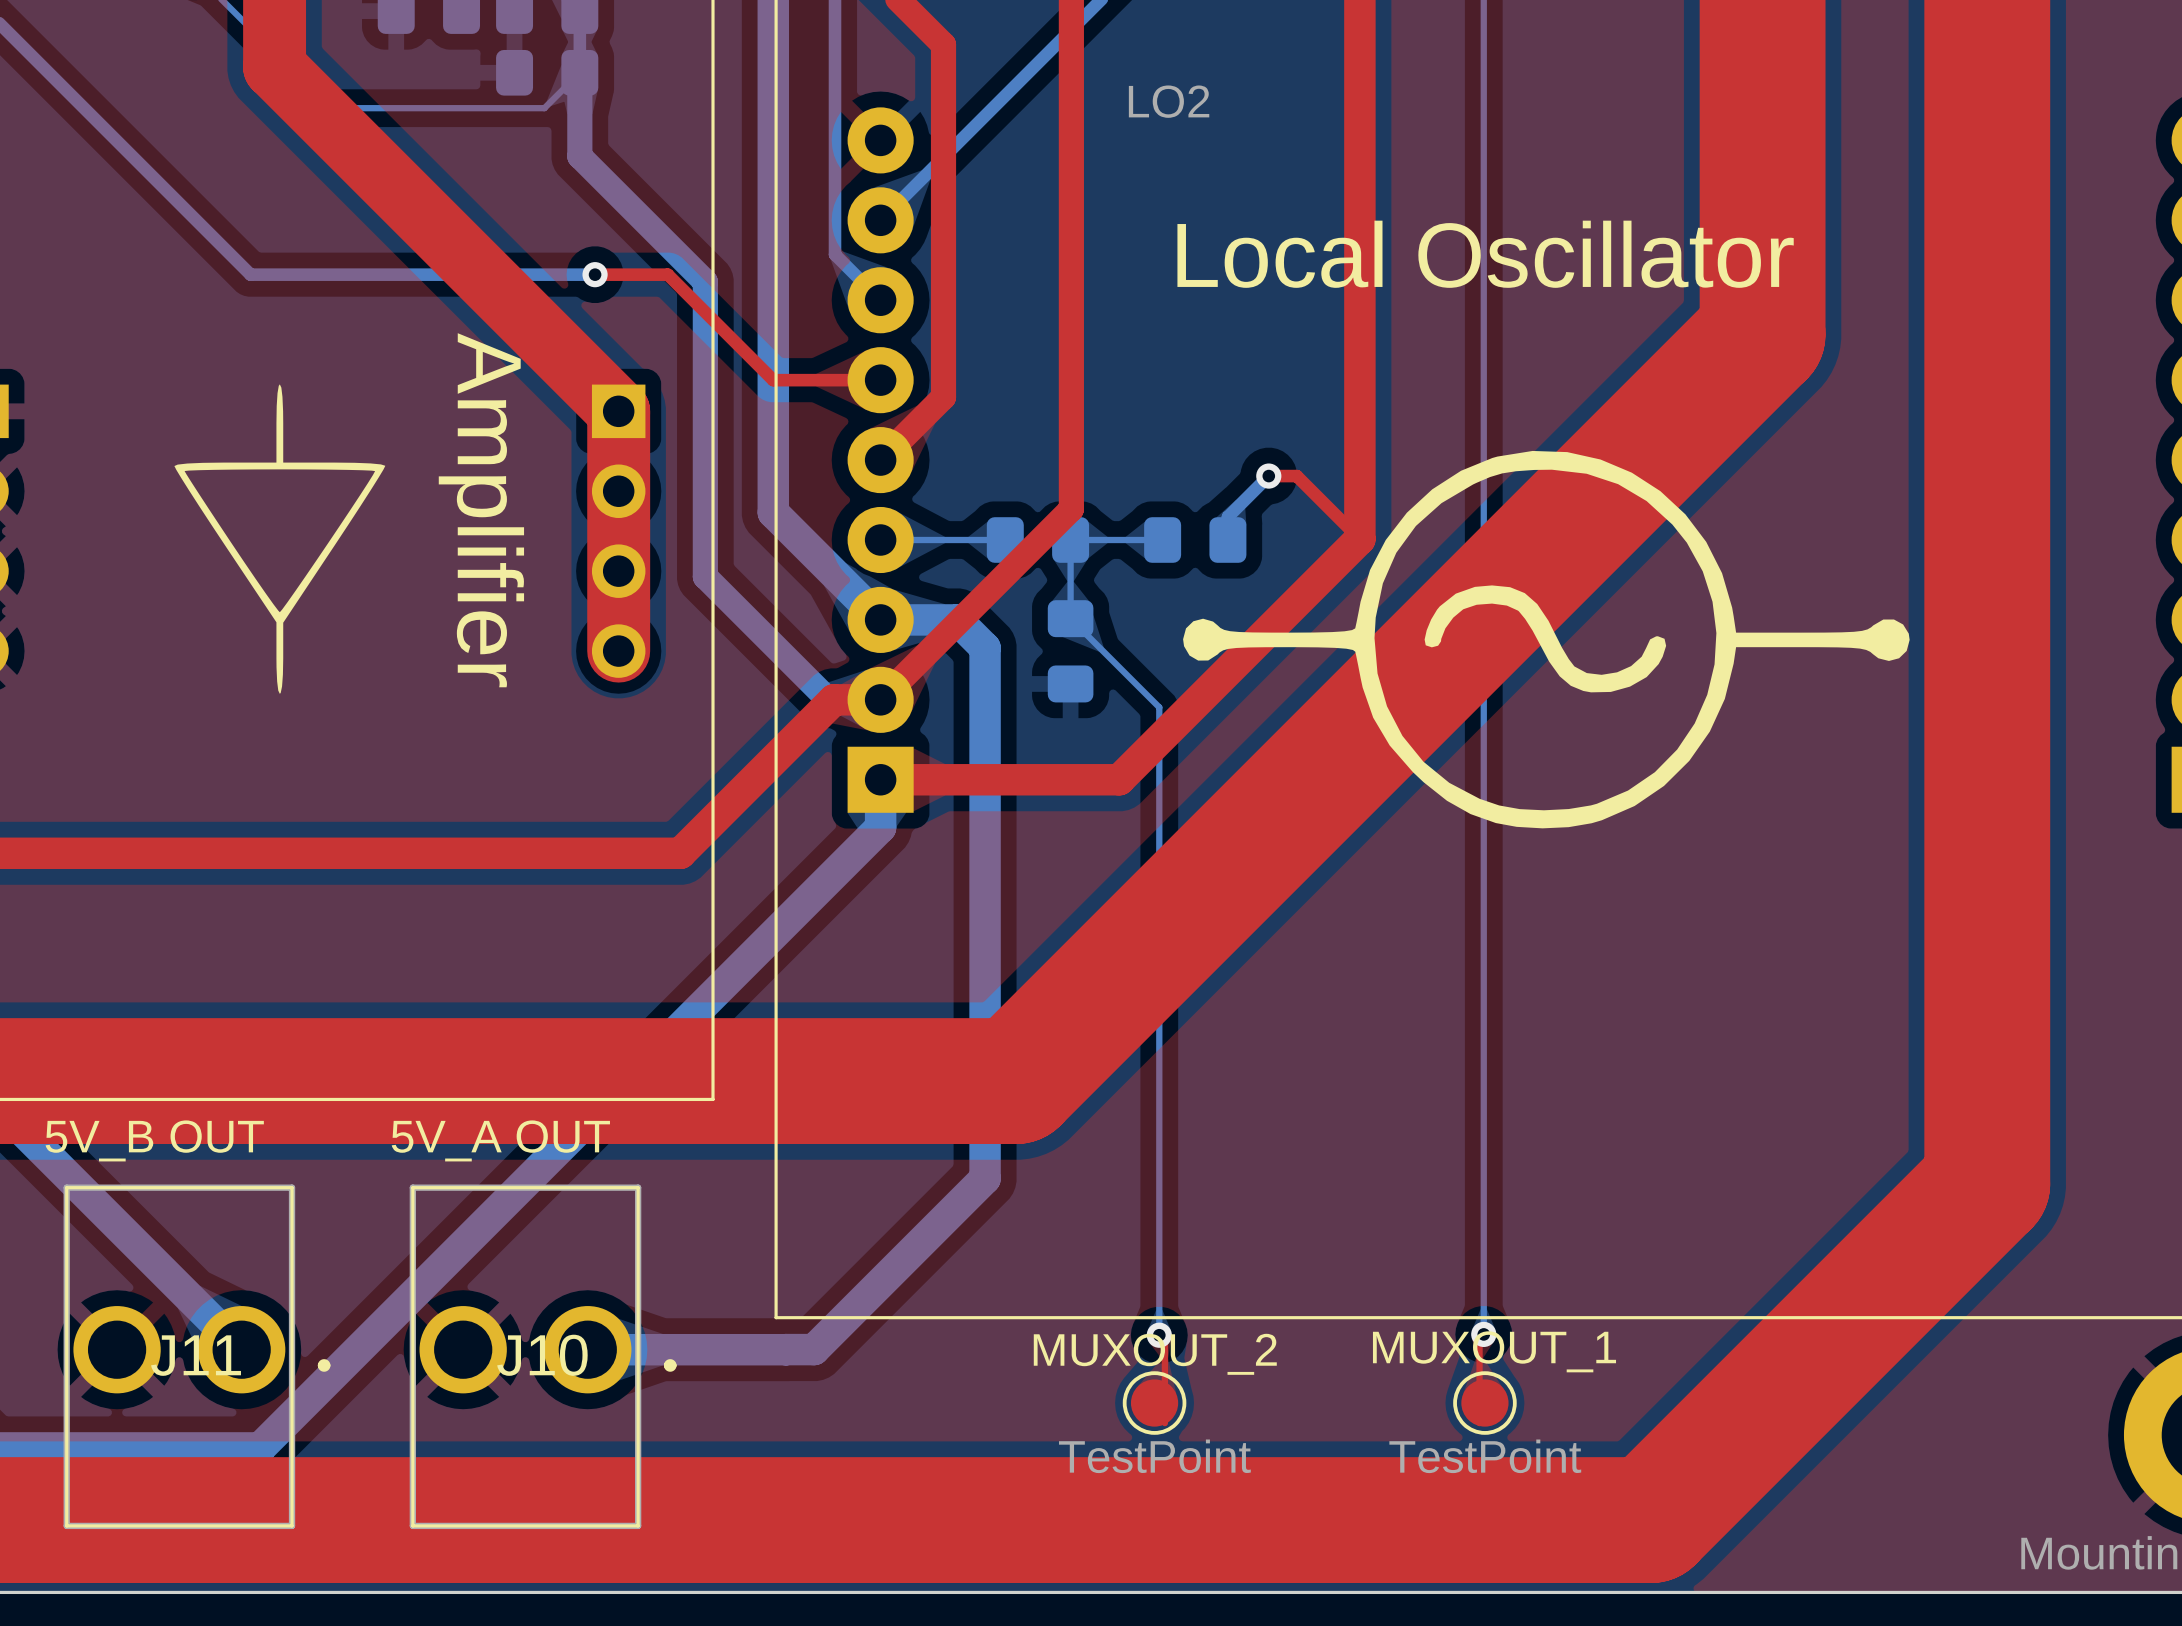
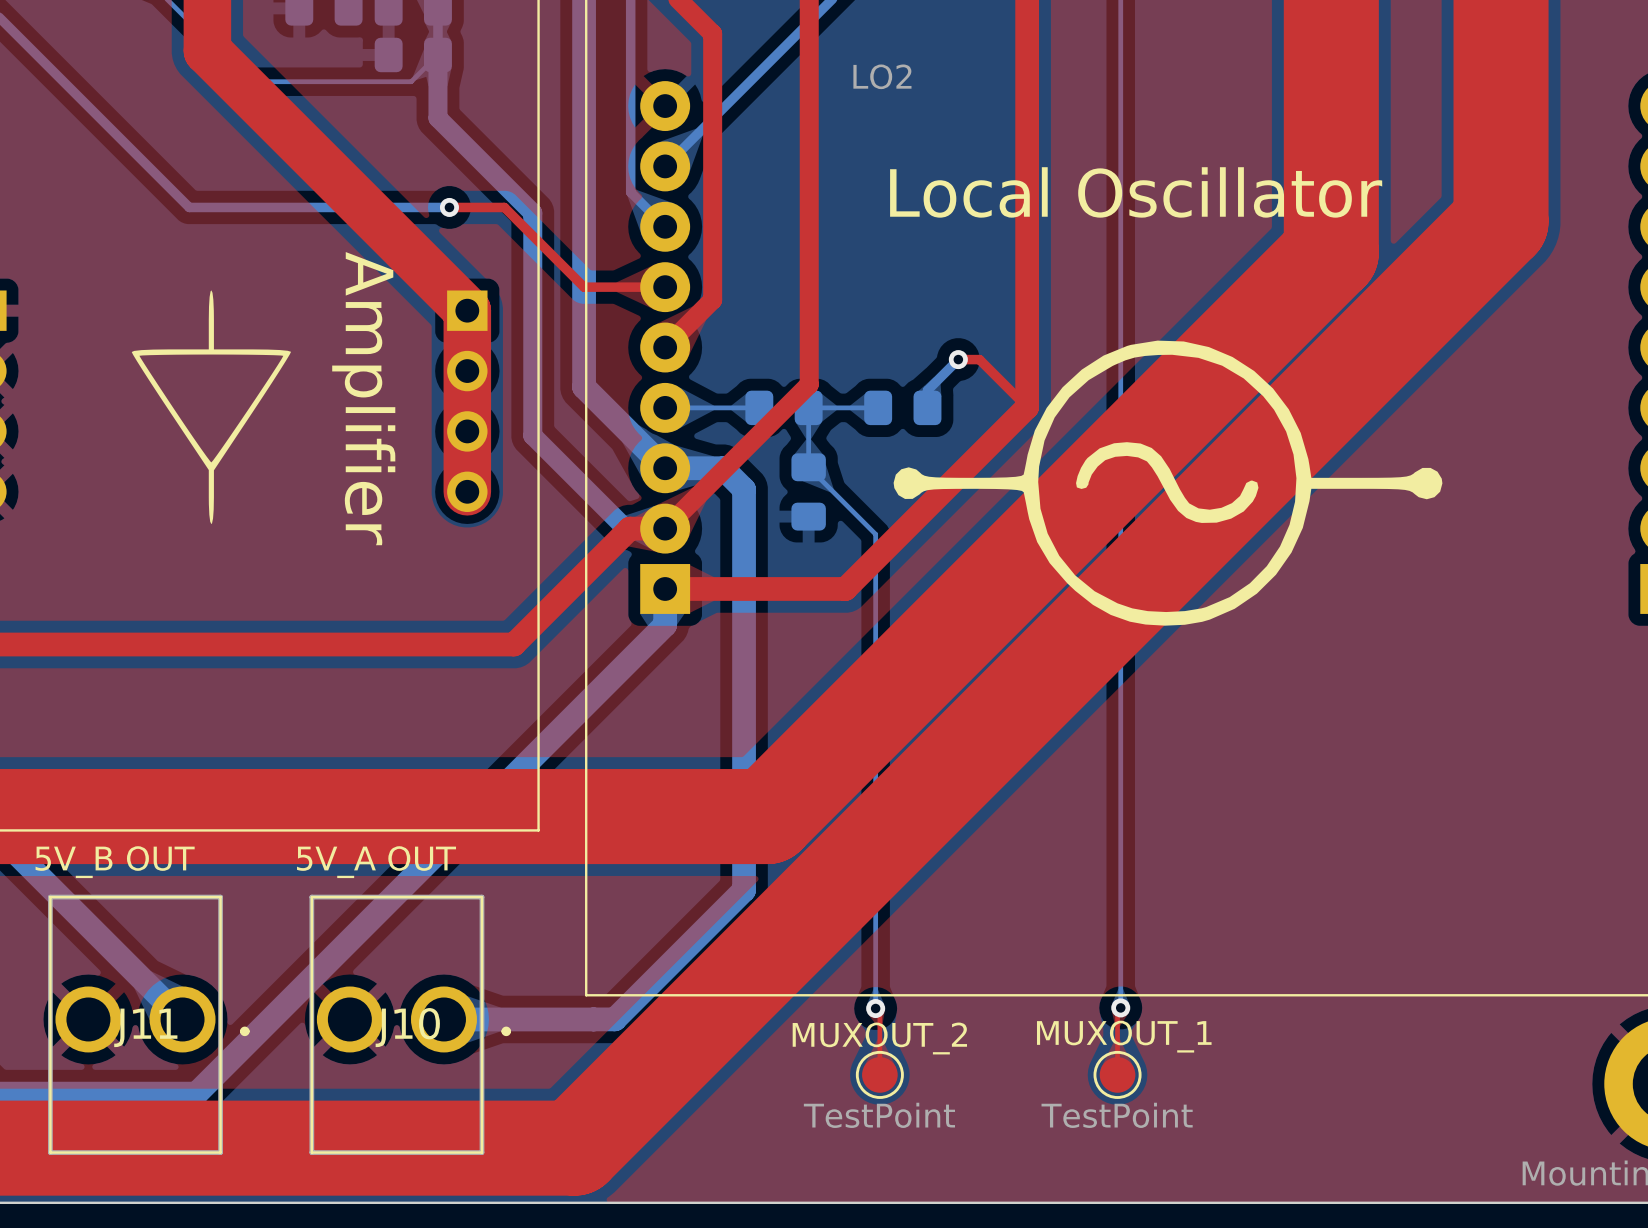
top track: (1987, 293) (1987, 1183) (1651, 1520) (760, 1520) -> (1501, 221) (574, 1148)
MUXOUT_2 position: (1154, 1403) -> (879, 1074)
MUXOUT_1 position: (1484, 1403) -> (1117, 1074)

